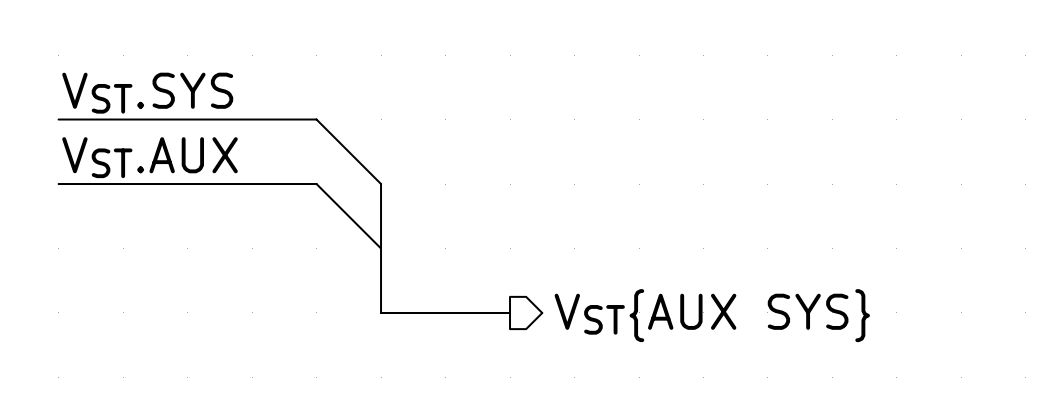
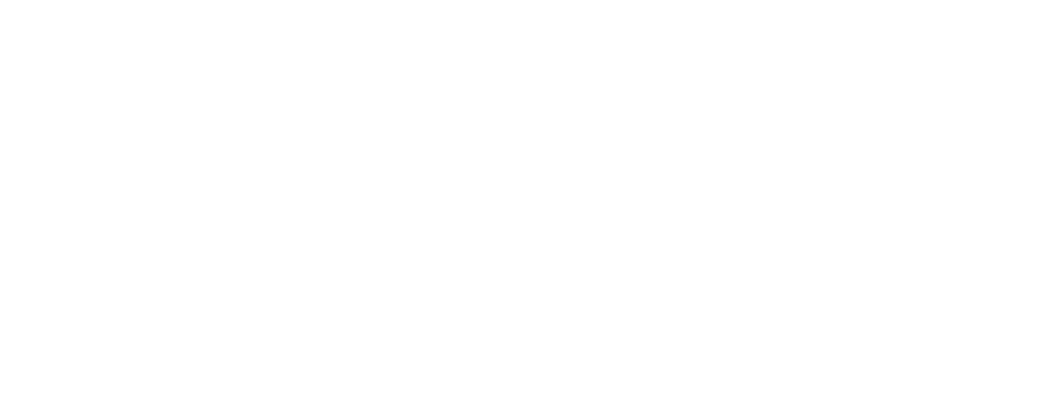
label: VST.SYS (147, 93) -> none
wire: (58, 119) (316, 119) (381, 184) -> none
label: VST.AUX (150, 157) -> none
wire: (58, 184) (316, 184) (381, 248) -> none
bus: (381, 184) (381, 312) (510, 312) -> none
hierarchical label: VST{AUX SYS} (712, 315) -> none

